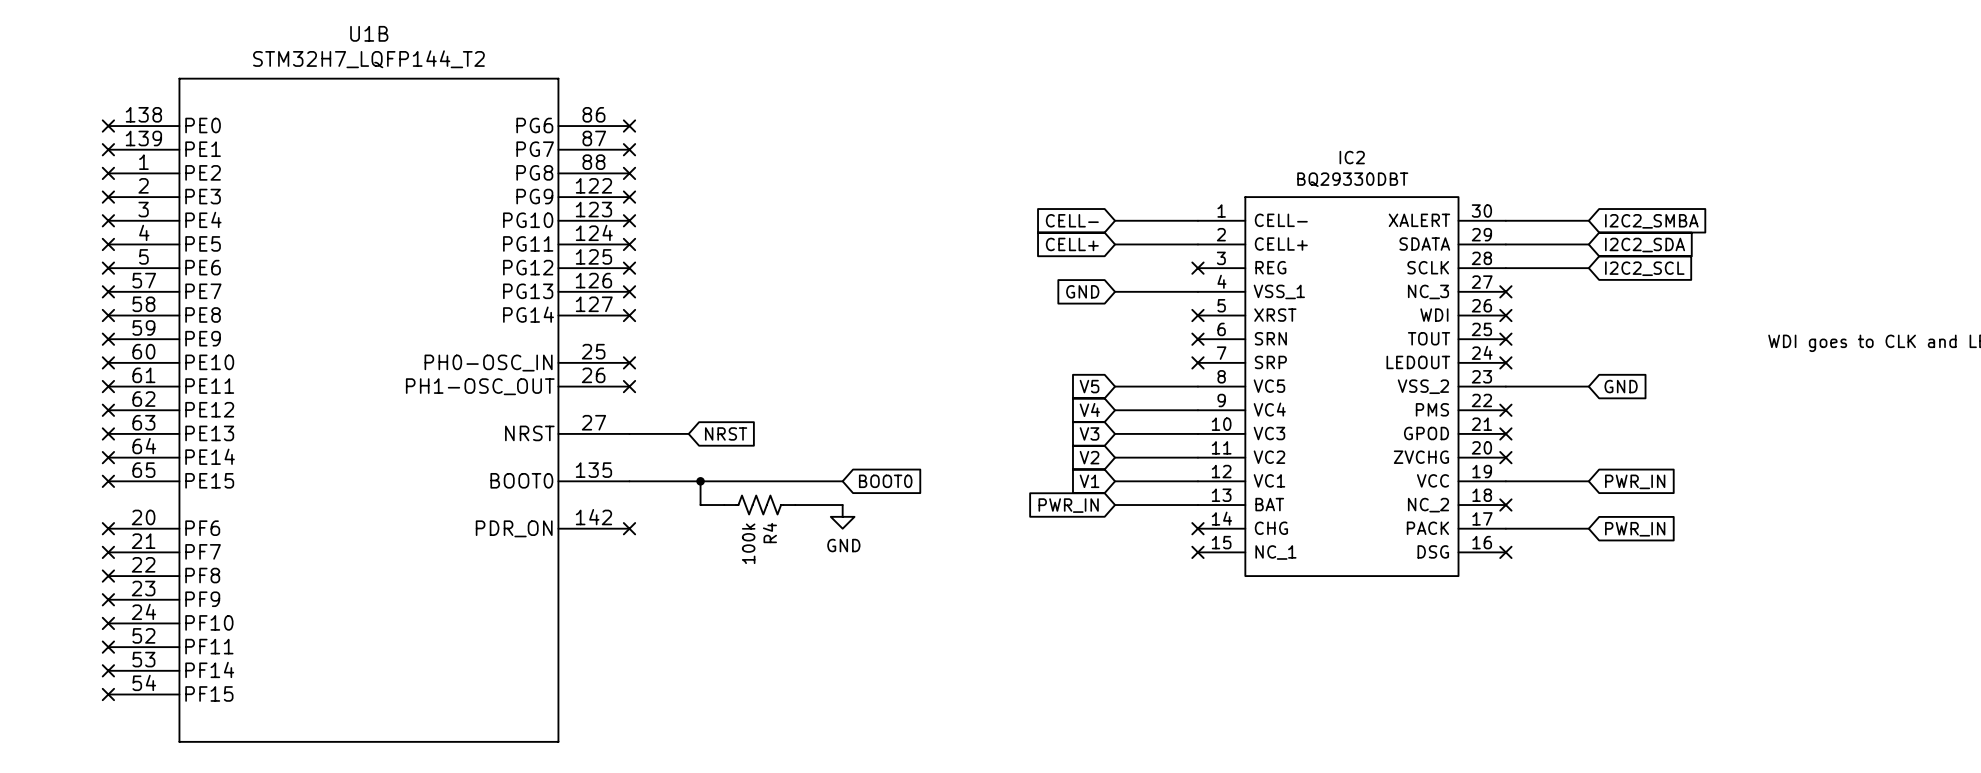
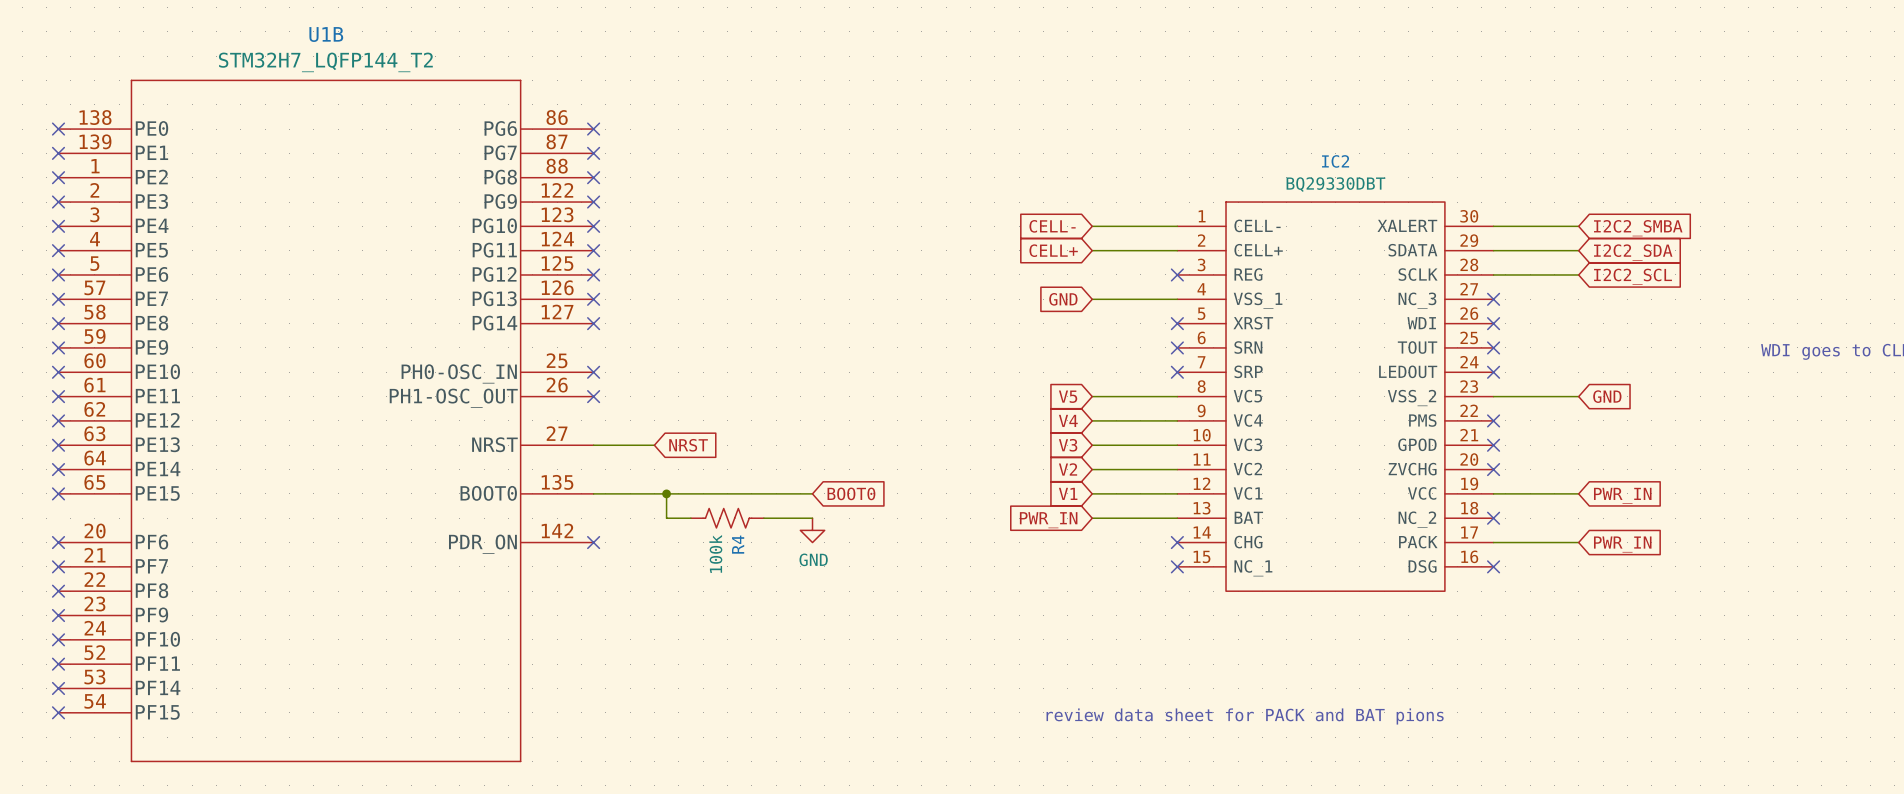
text: none -> review data sheet for PACK and BAT pions (1245, 716)

